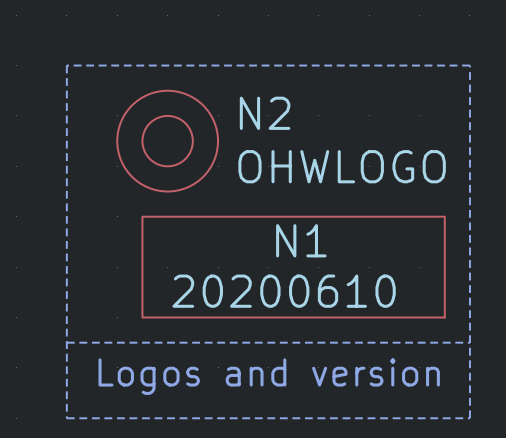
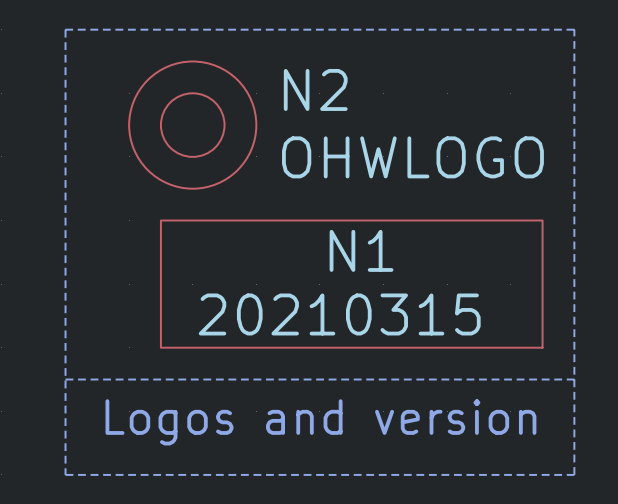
N1 value: 20200610 (284, 291) -> 20210315 (339, 314)

